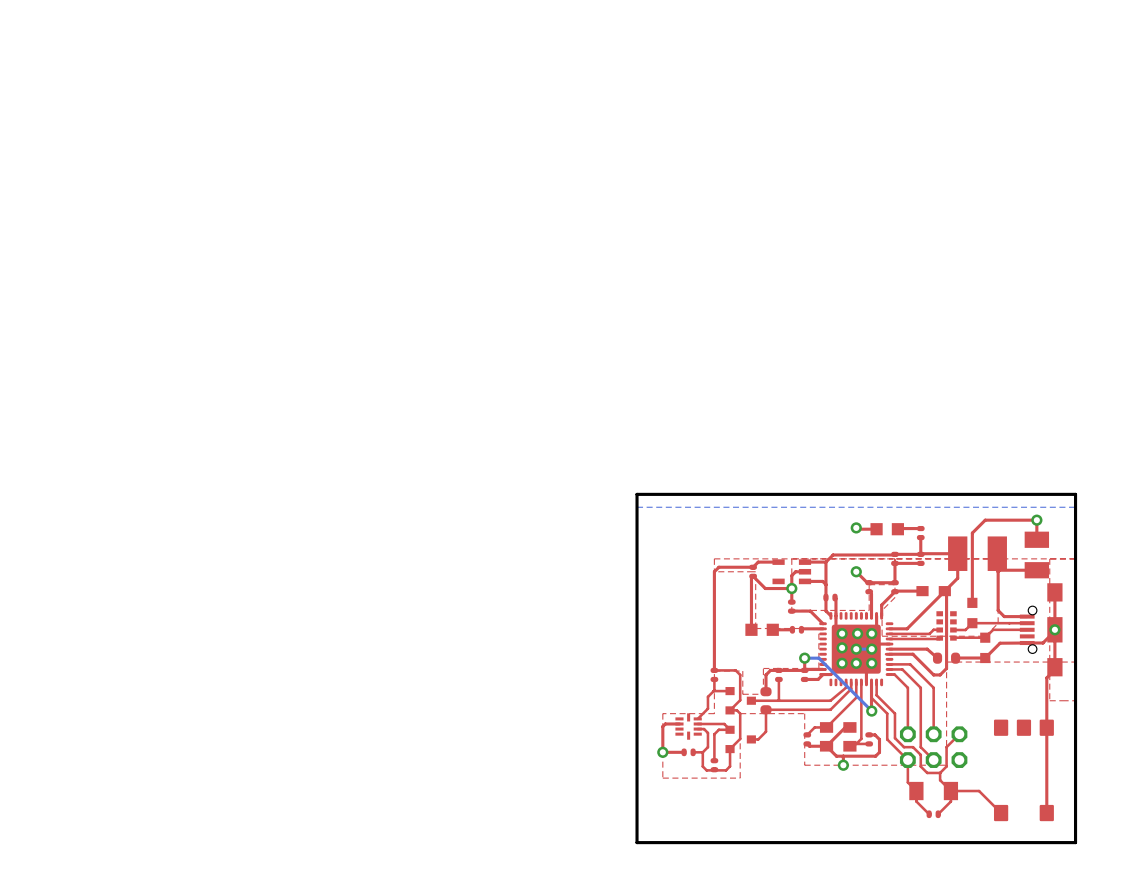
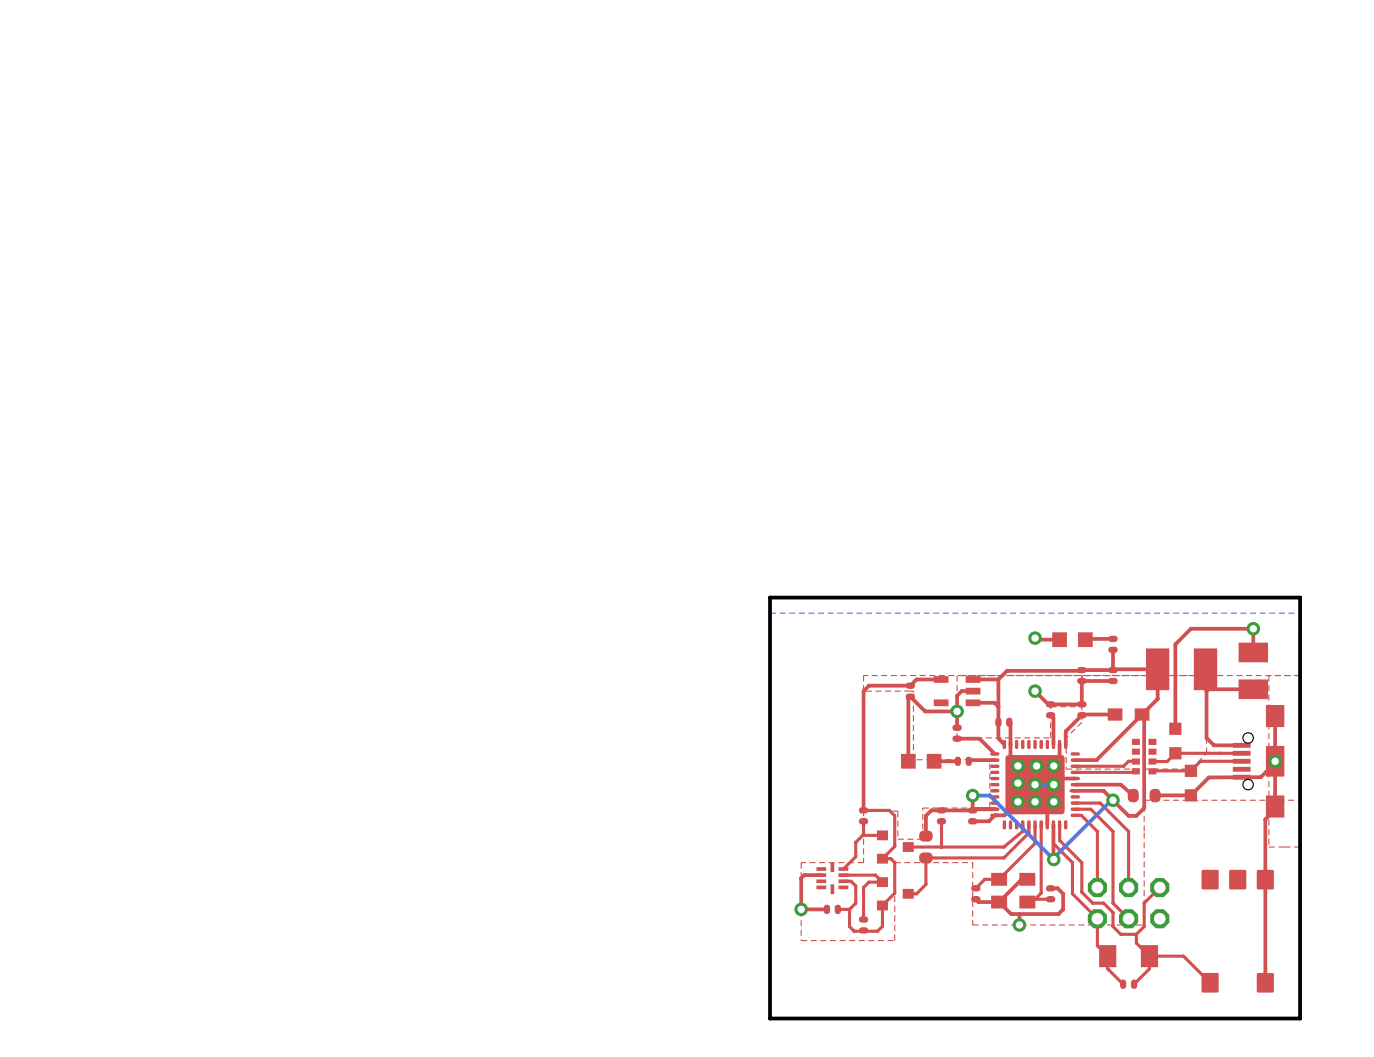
bottom track: none -> (1112, 800) (1053, 857)
via: none -> (1112, 800)

